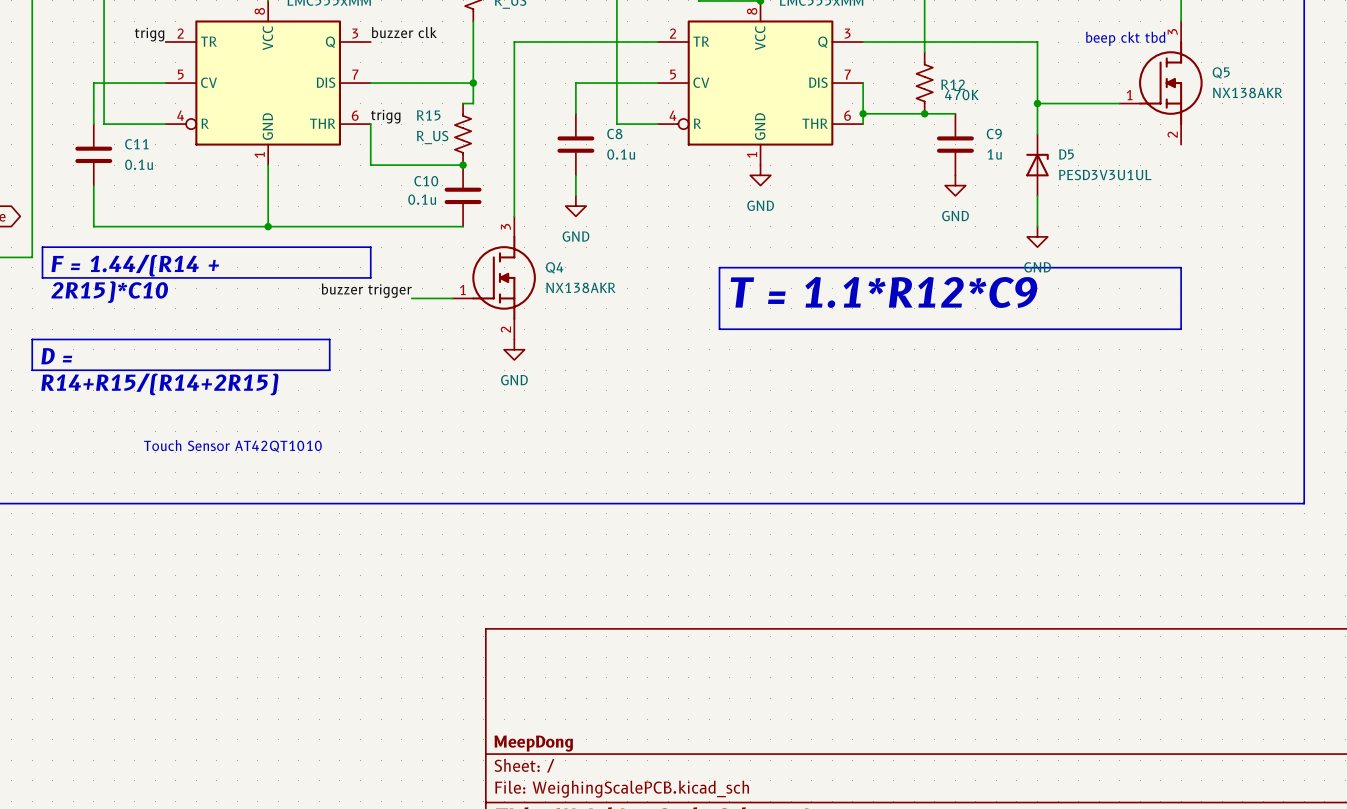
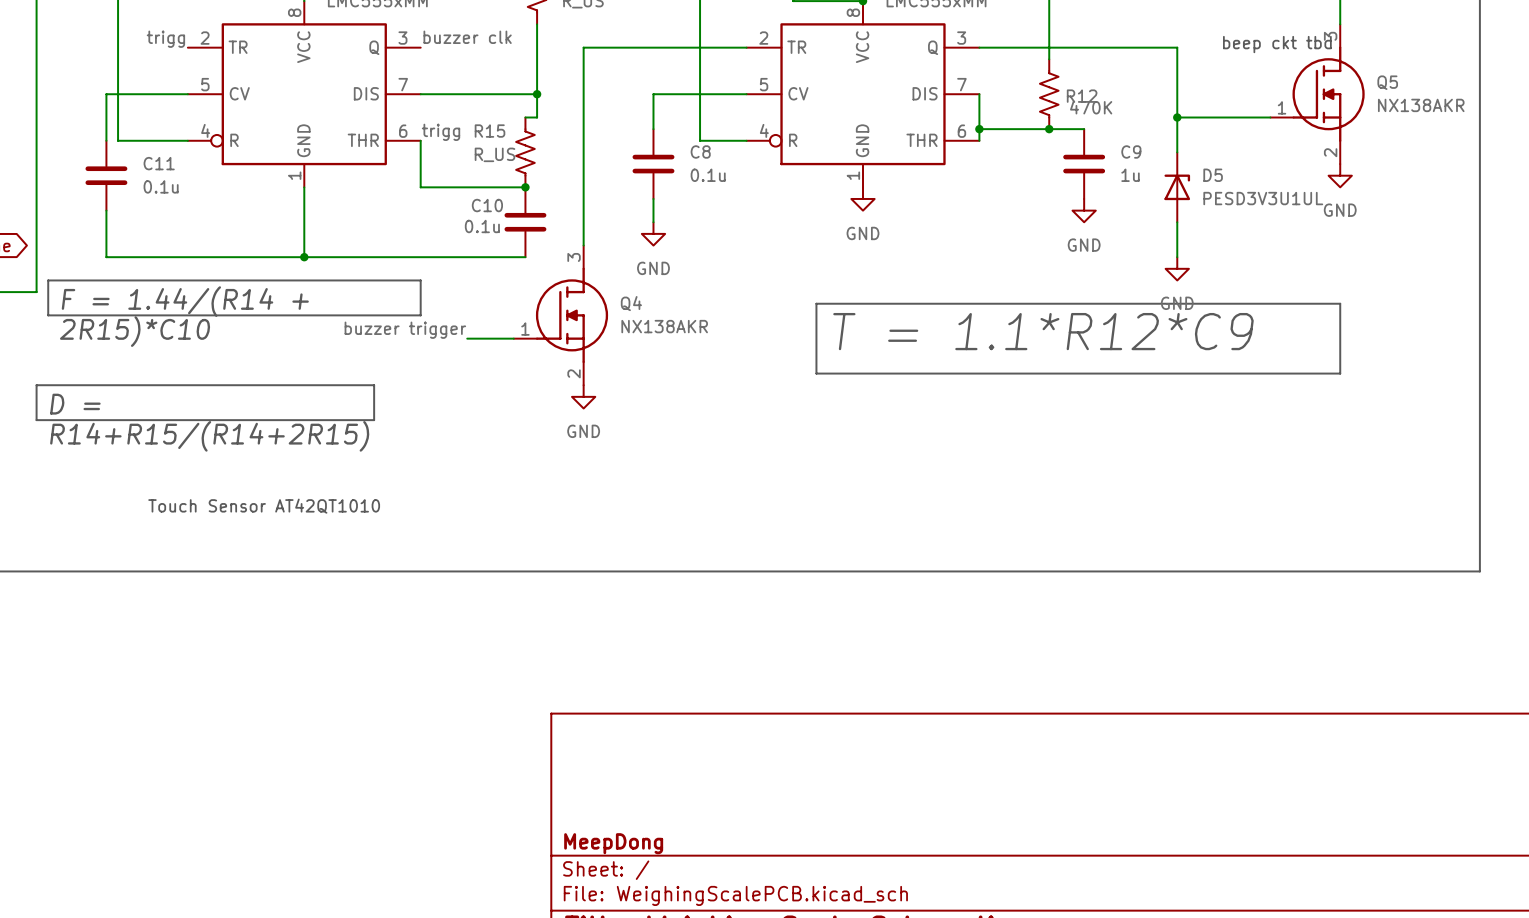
power symbol: none -> GND (1340, 175)

